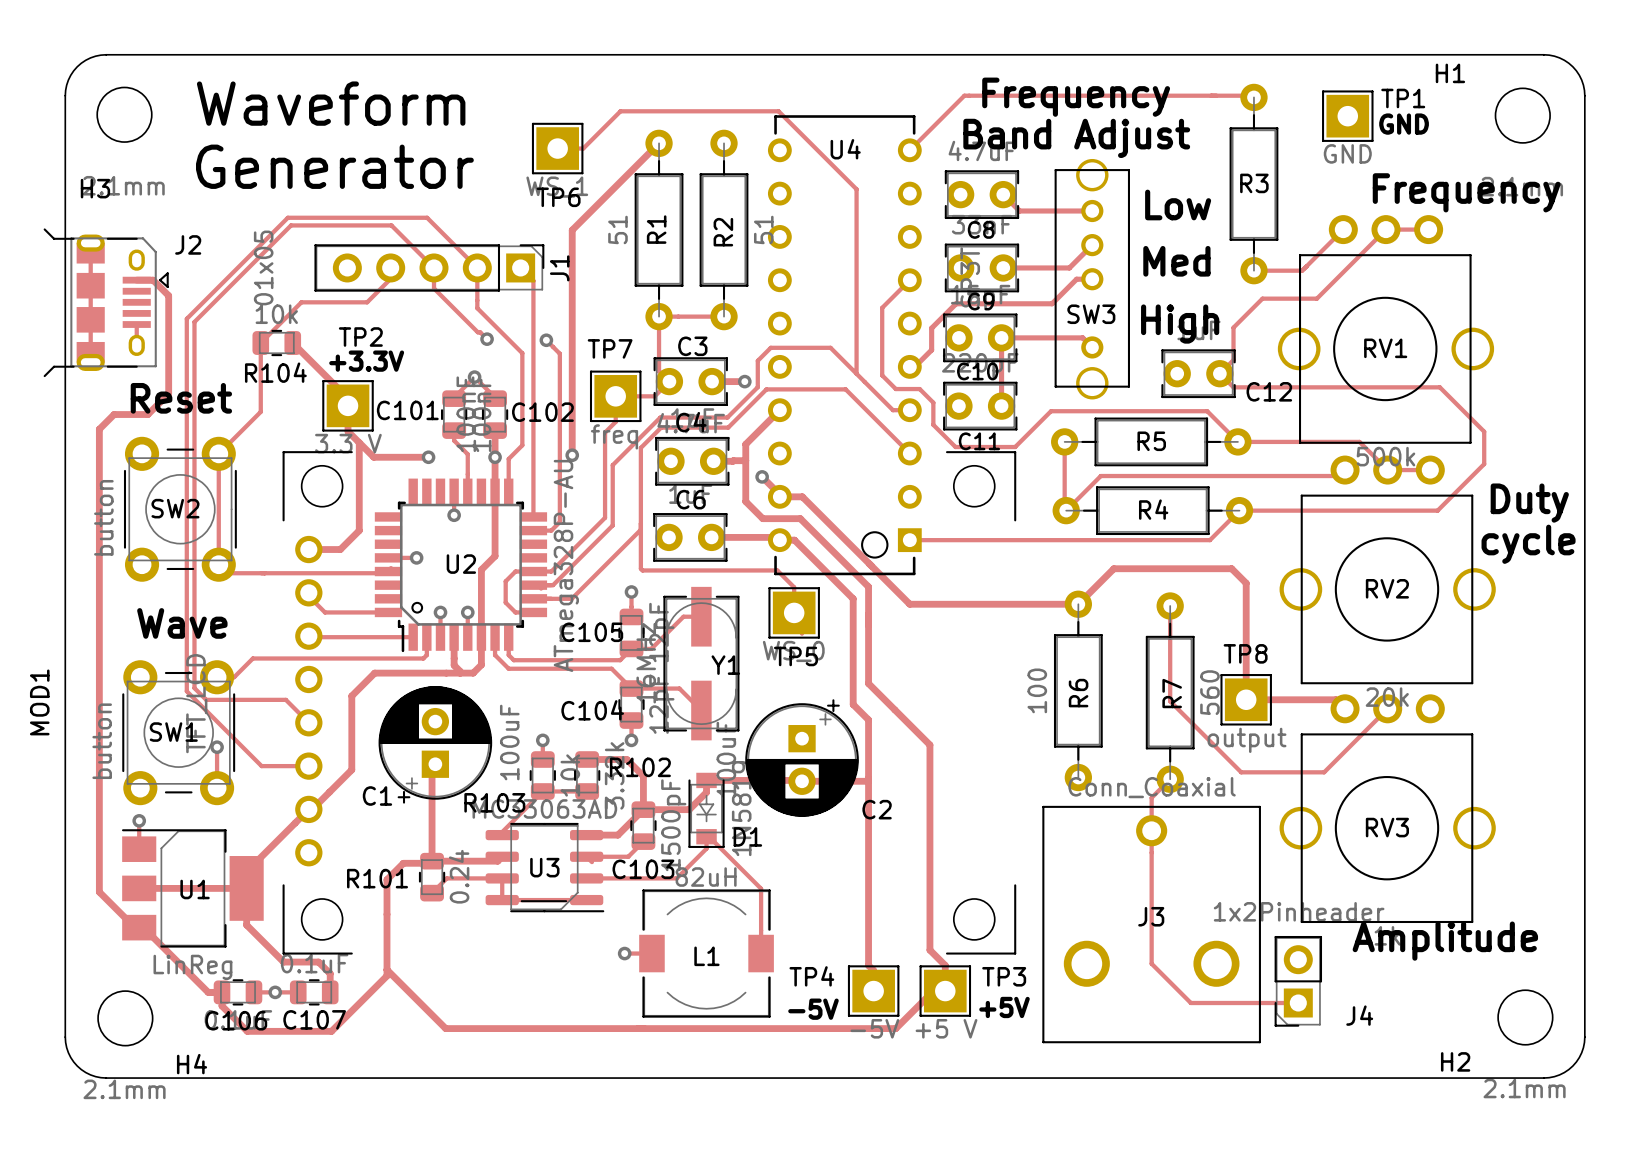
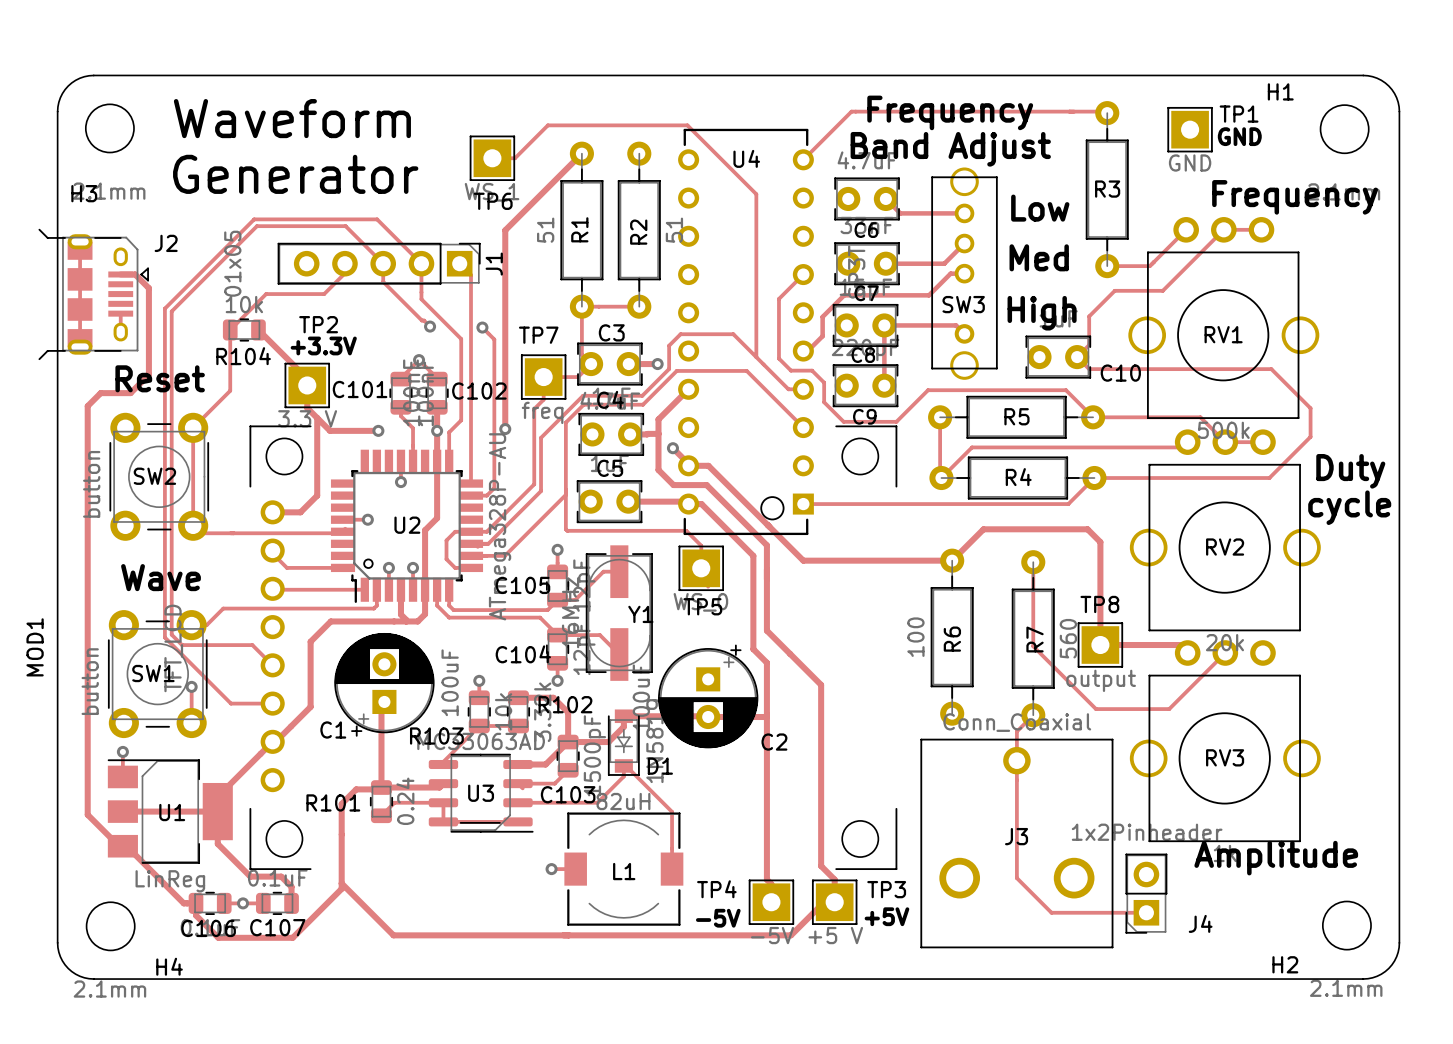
C8 name: C8 (981, 229) -> C6 (866, 230)
C9 name: C9 (981, 301) -> C7 (866, 293)
C10 name: C10 (977, 371) -> C8 (863, 355)
C12 name: C12 (1269, 391) -> C10 (1120, 373)
C11 name: C11 (979, 441) -> C9 (864, 416)
C6 name: C6 (691, 499) -> C5 (610, 468)

